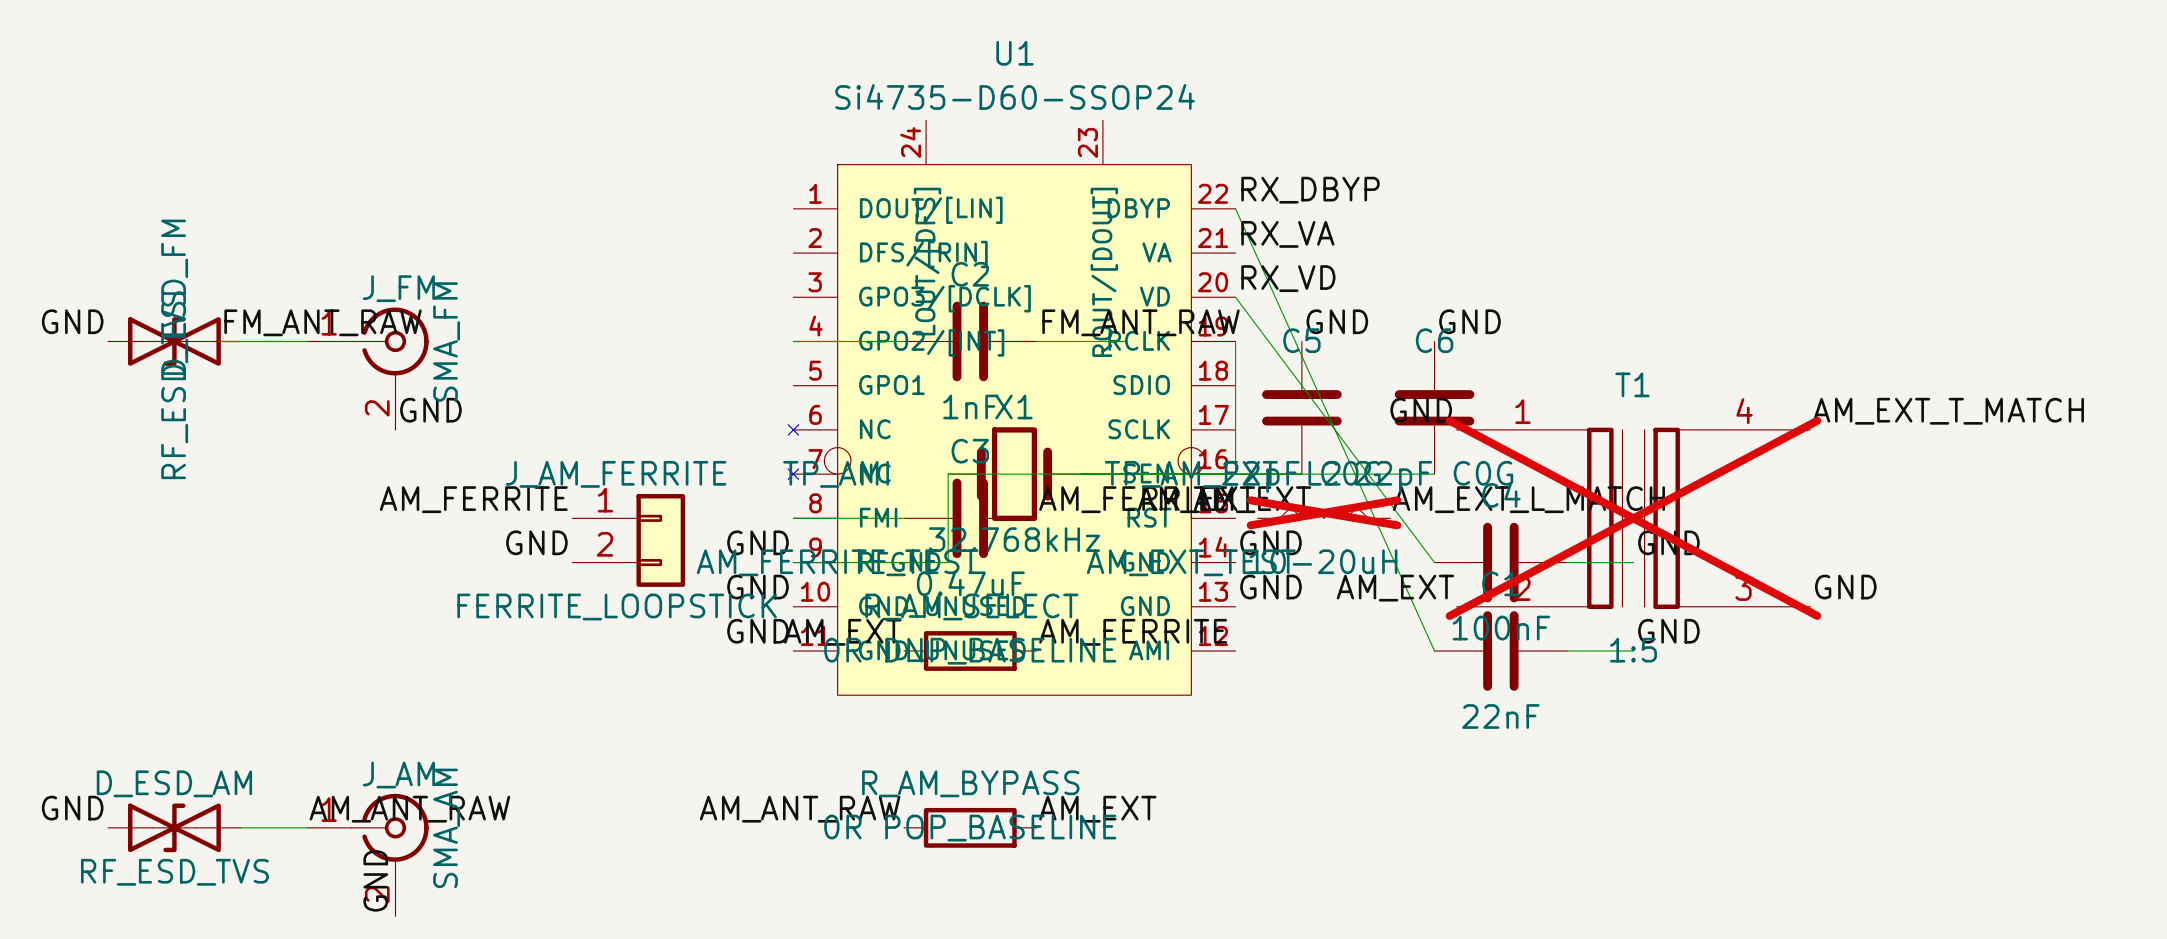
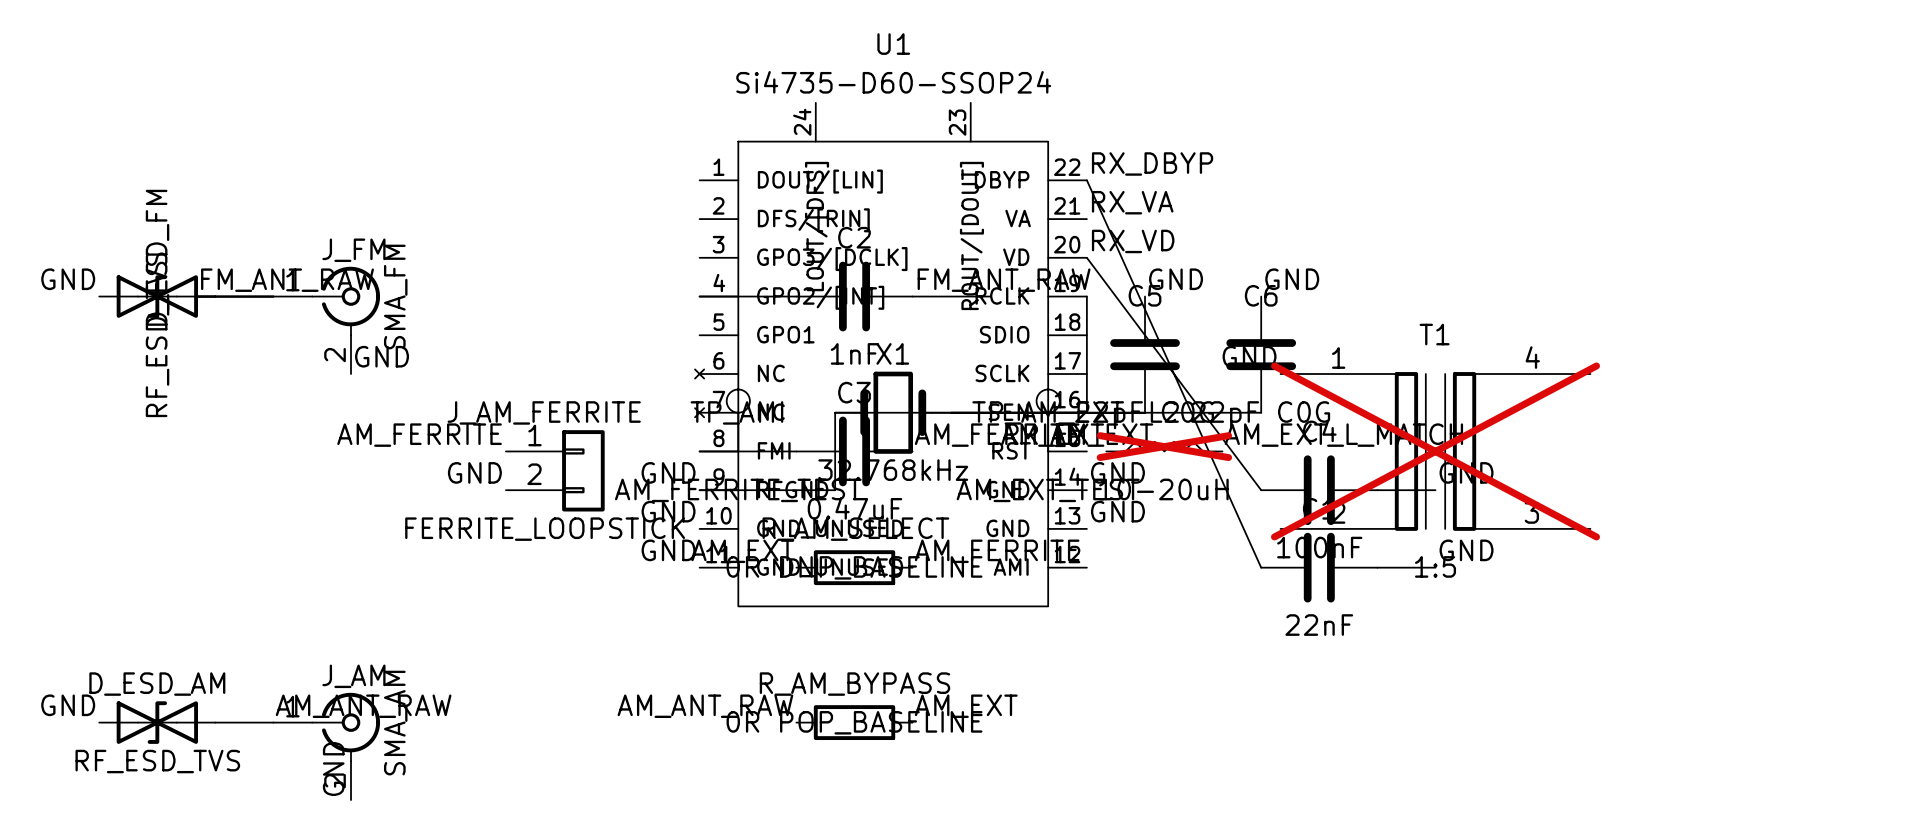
label: AM_EXT_T_MATCH (1948, 411) -> none
label: GND (1845, 587) -> none
label: AM_EXT (1395, 588) -> none

